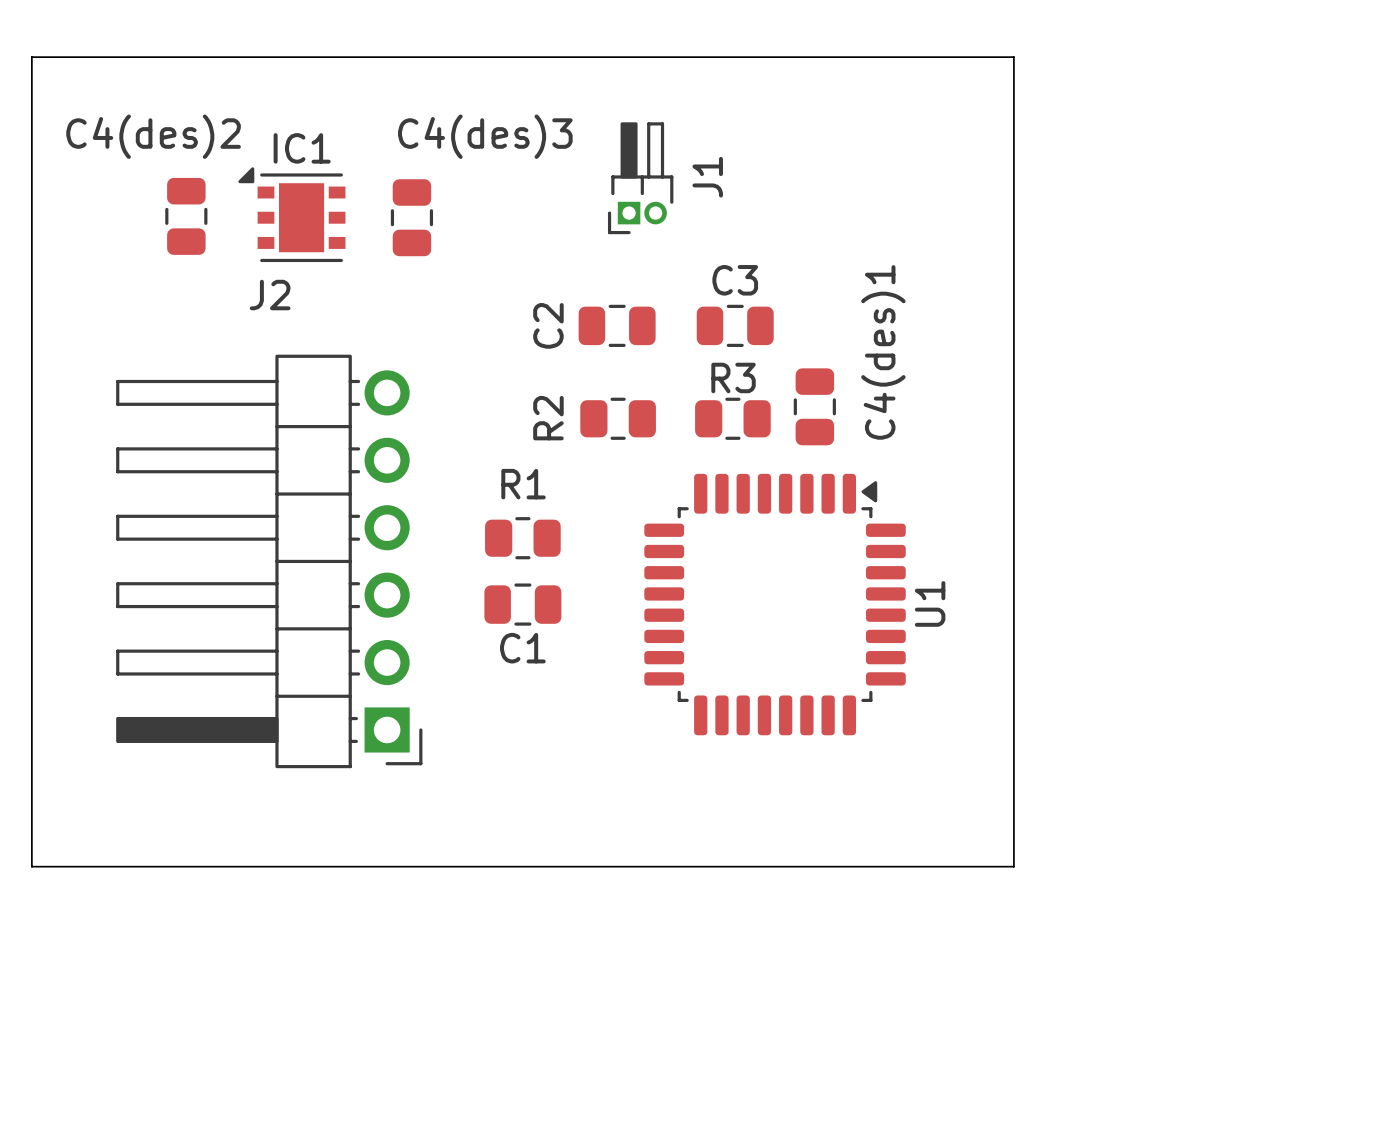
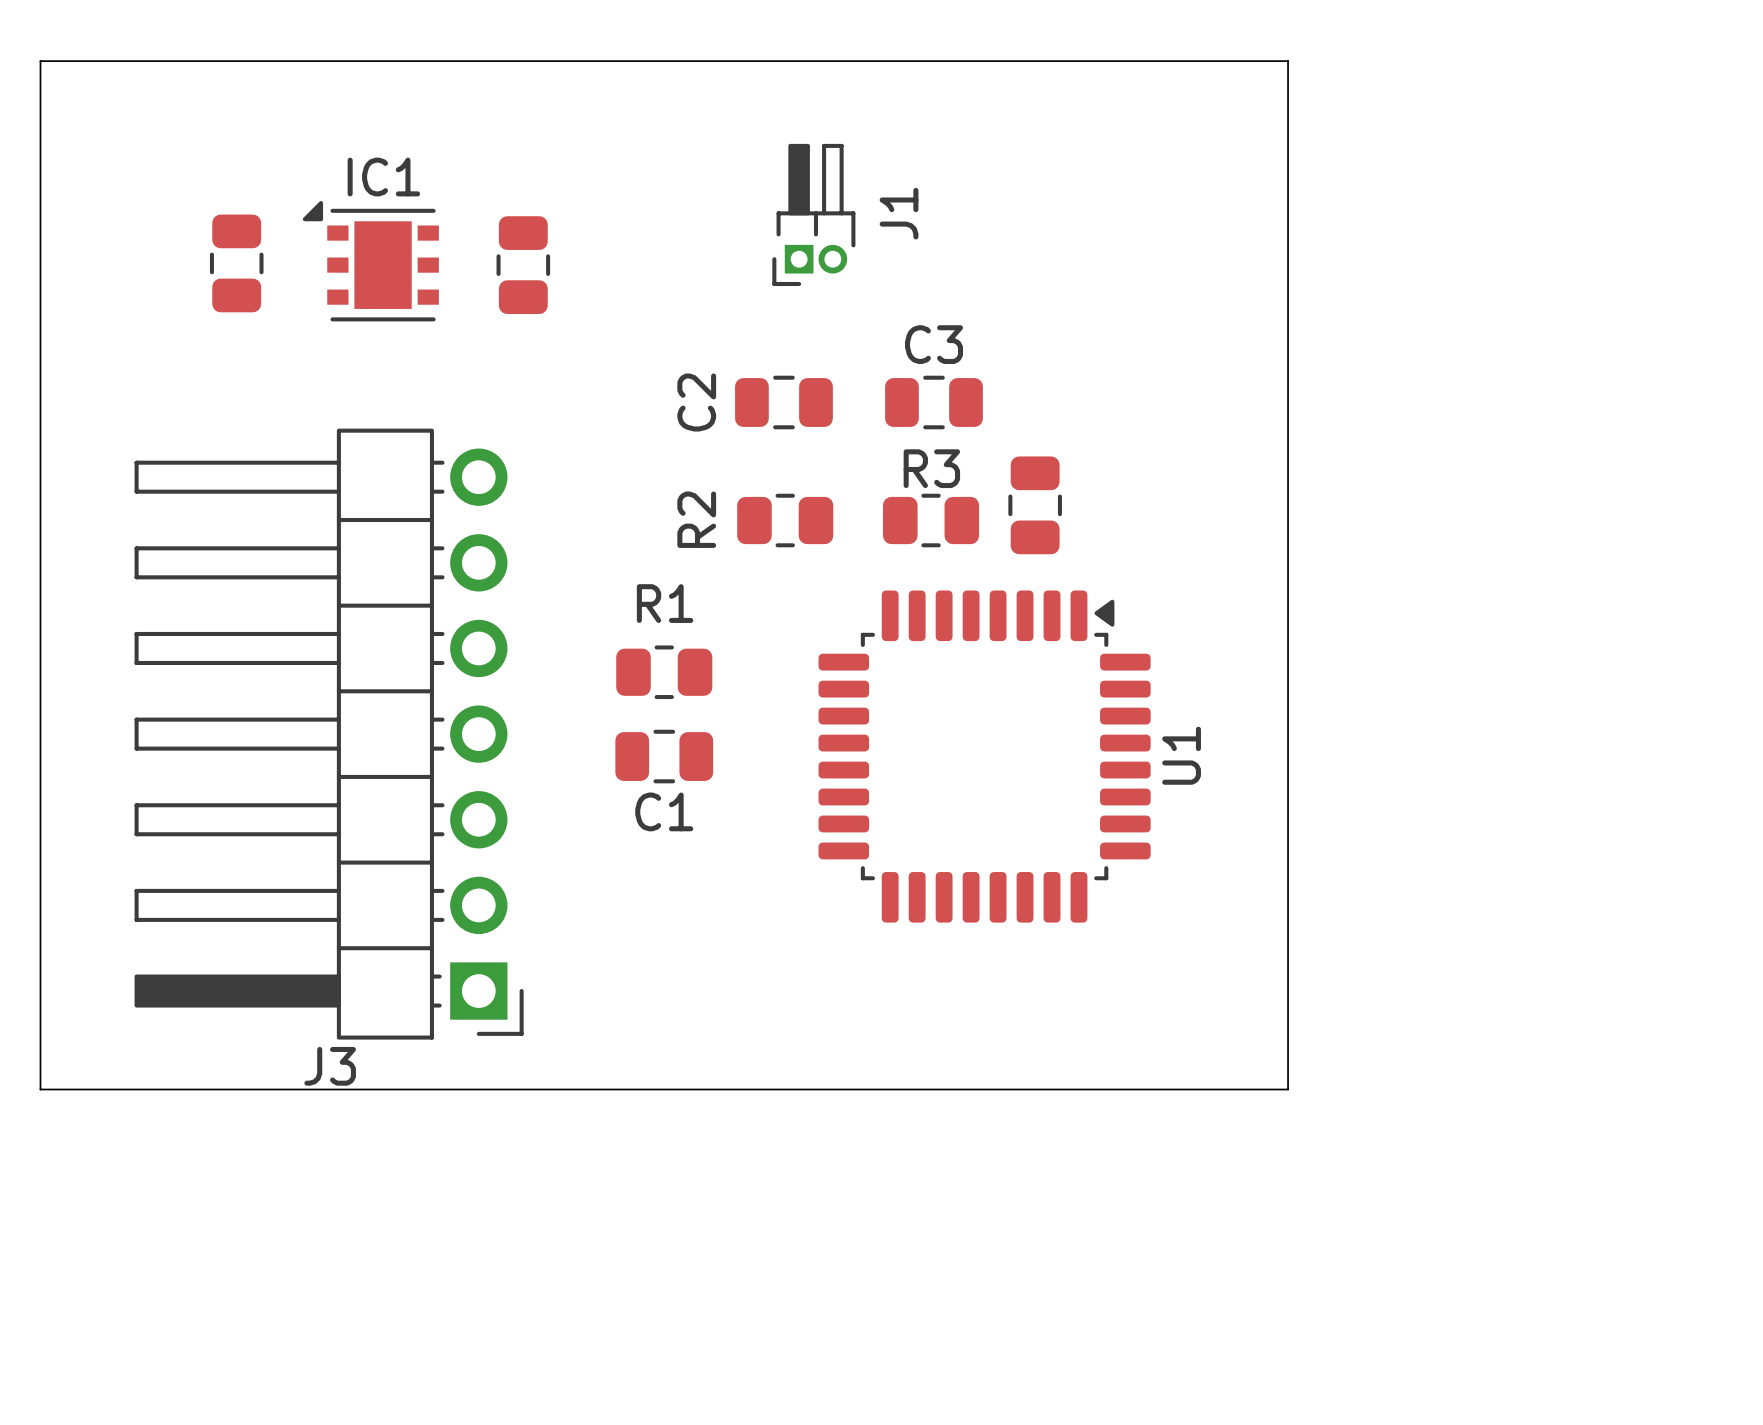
C4(des)2 name: C4(des)2 (153, 136) -> none
C4(des)3 name: C4(des)3 (485, 136) -> none
C4(des)1 name: C4(des)1 (883, 352) -> none
J2: (269, 561) -> none
J3: none -> (329, 734)

